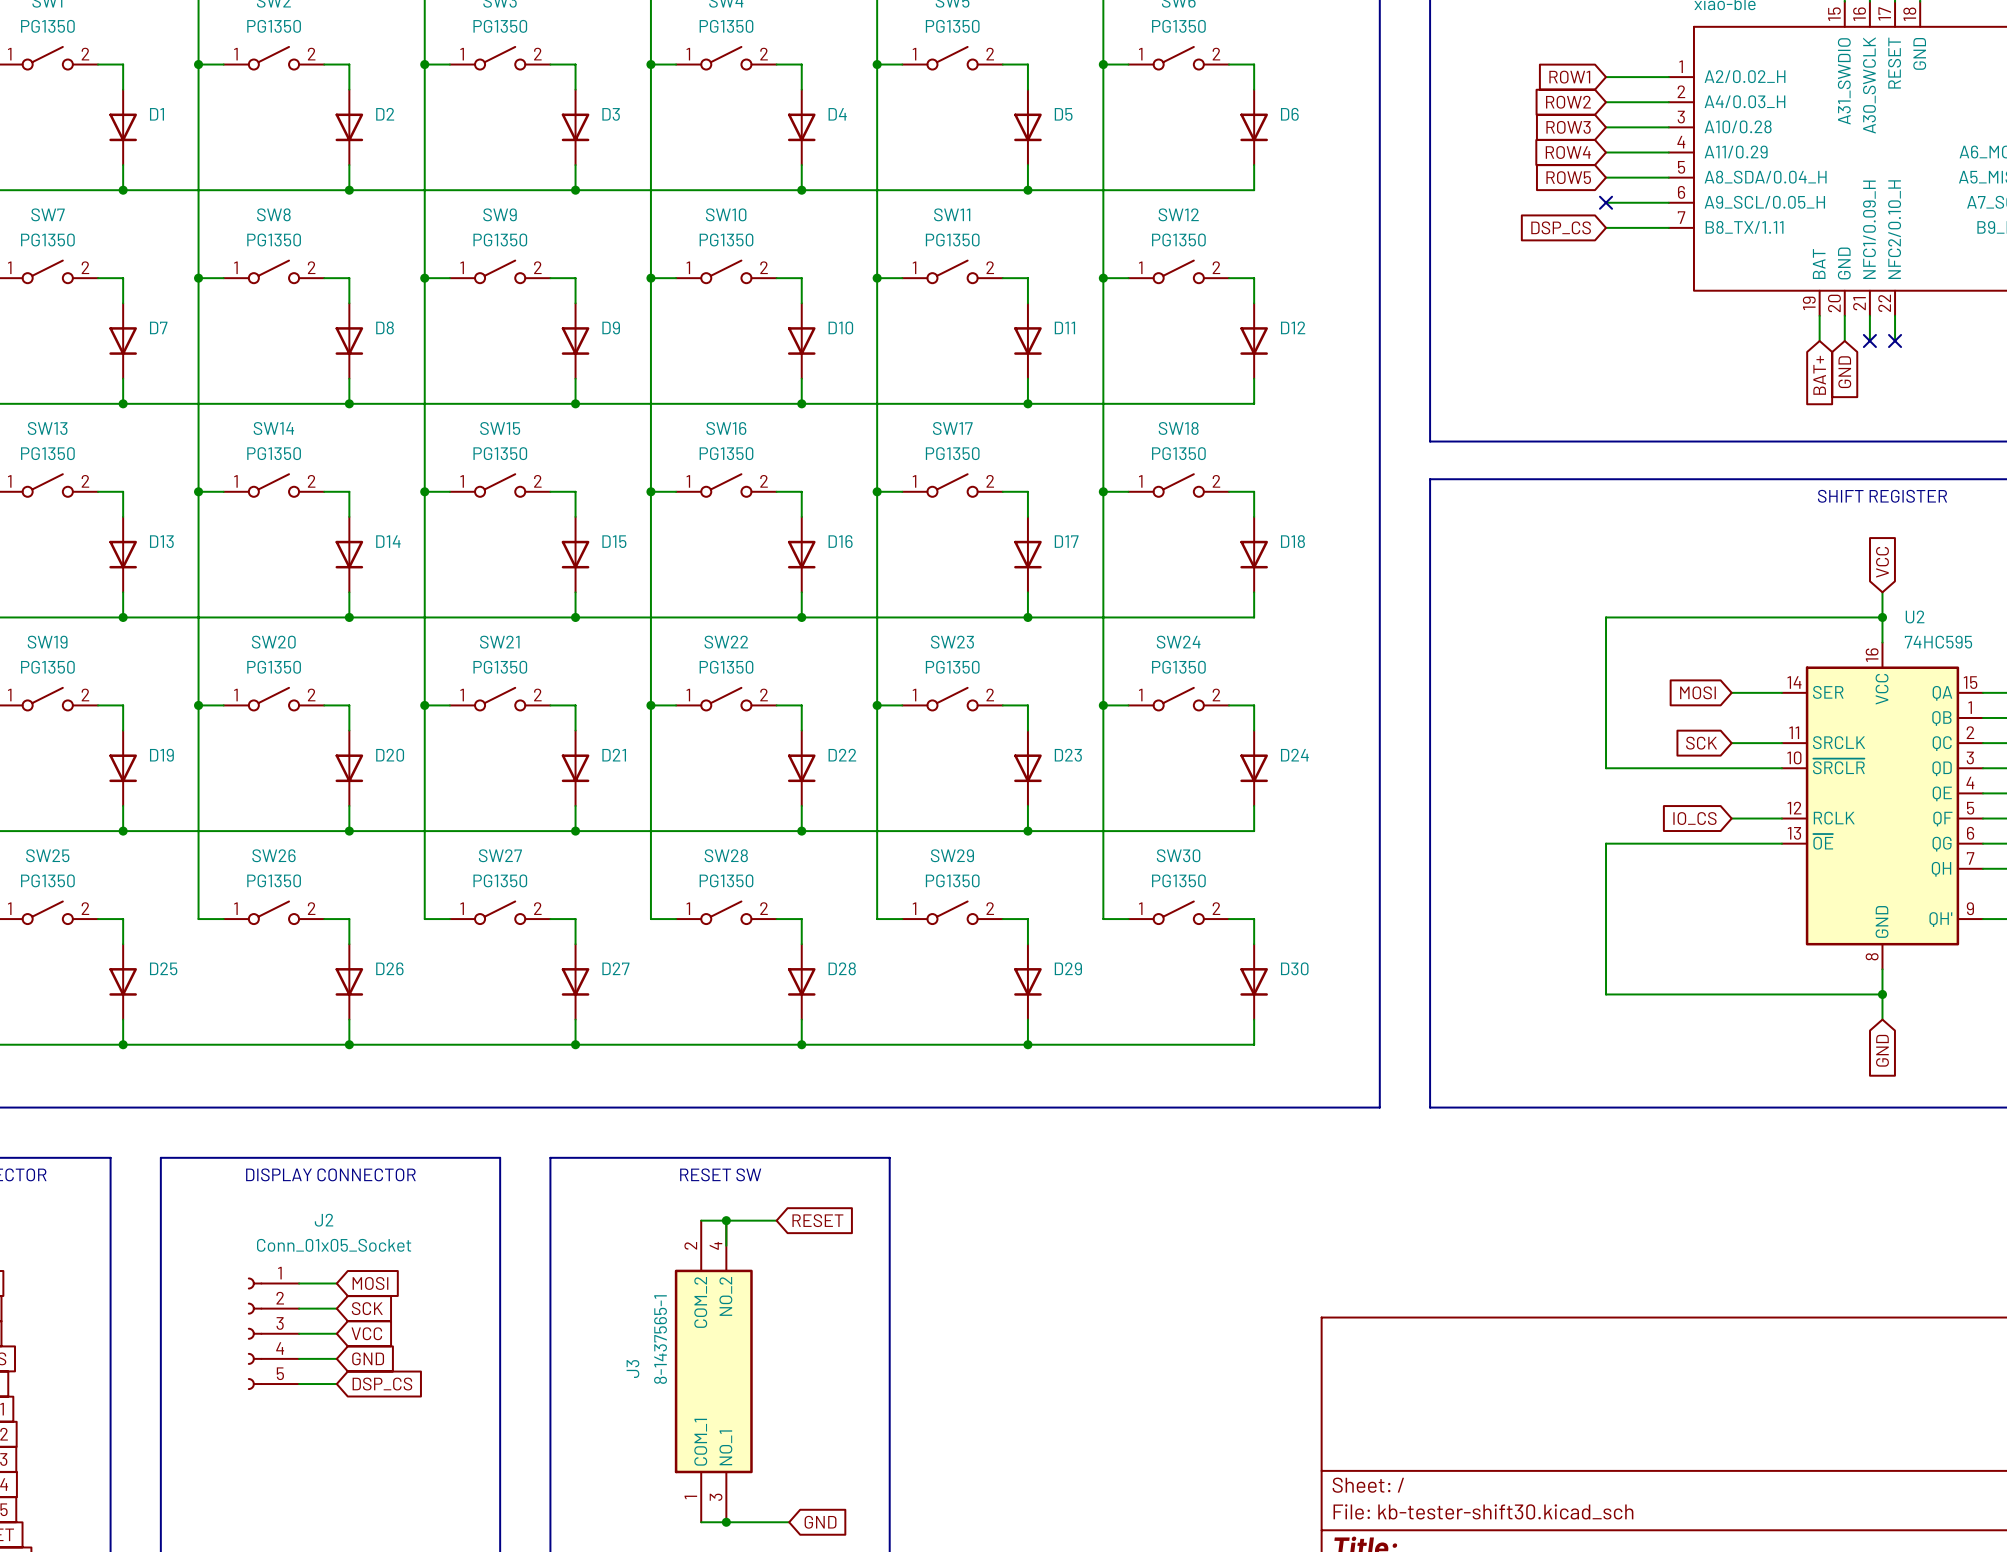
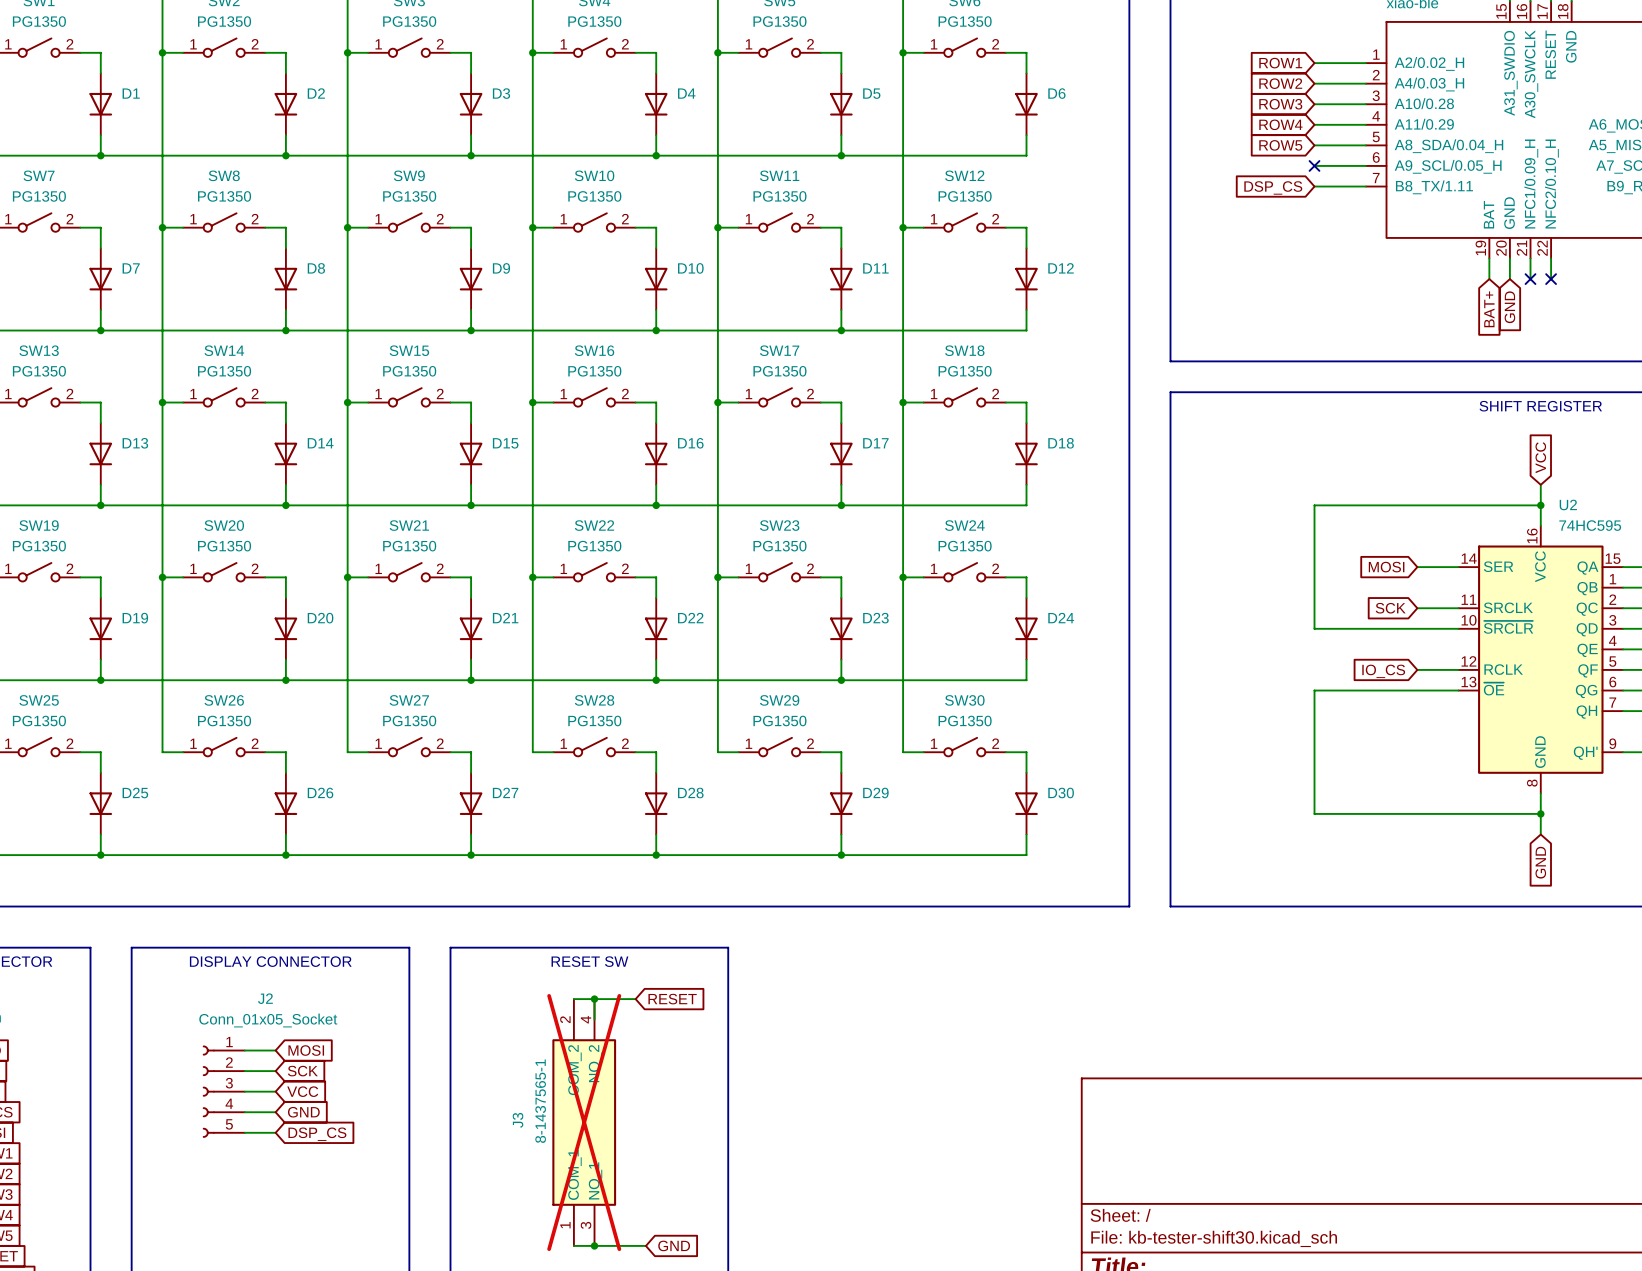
J3 do-not-place cross: none -> (584, 1122)

